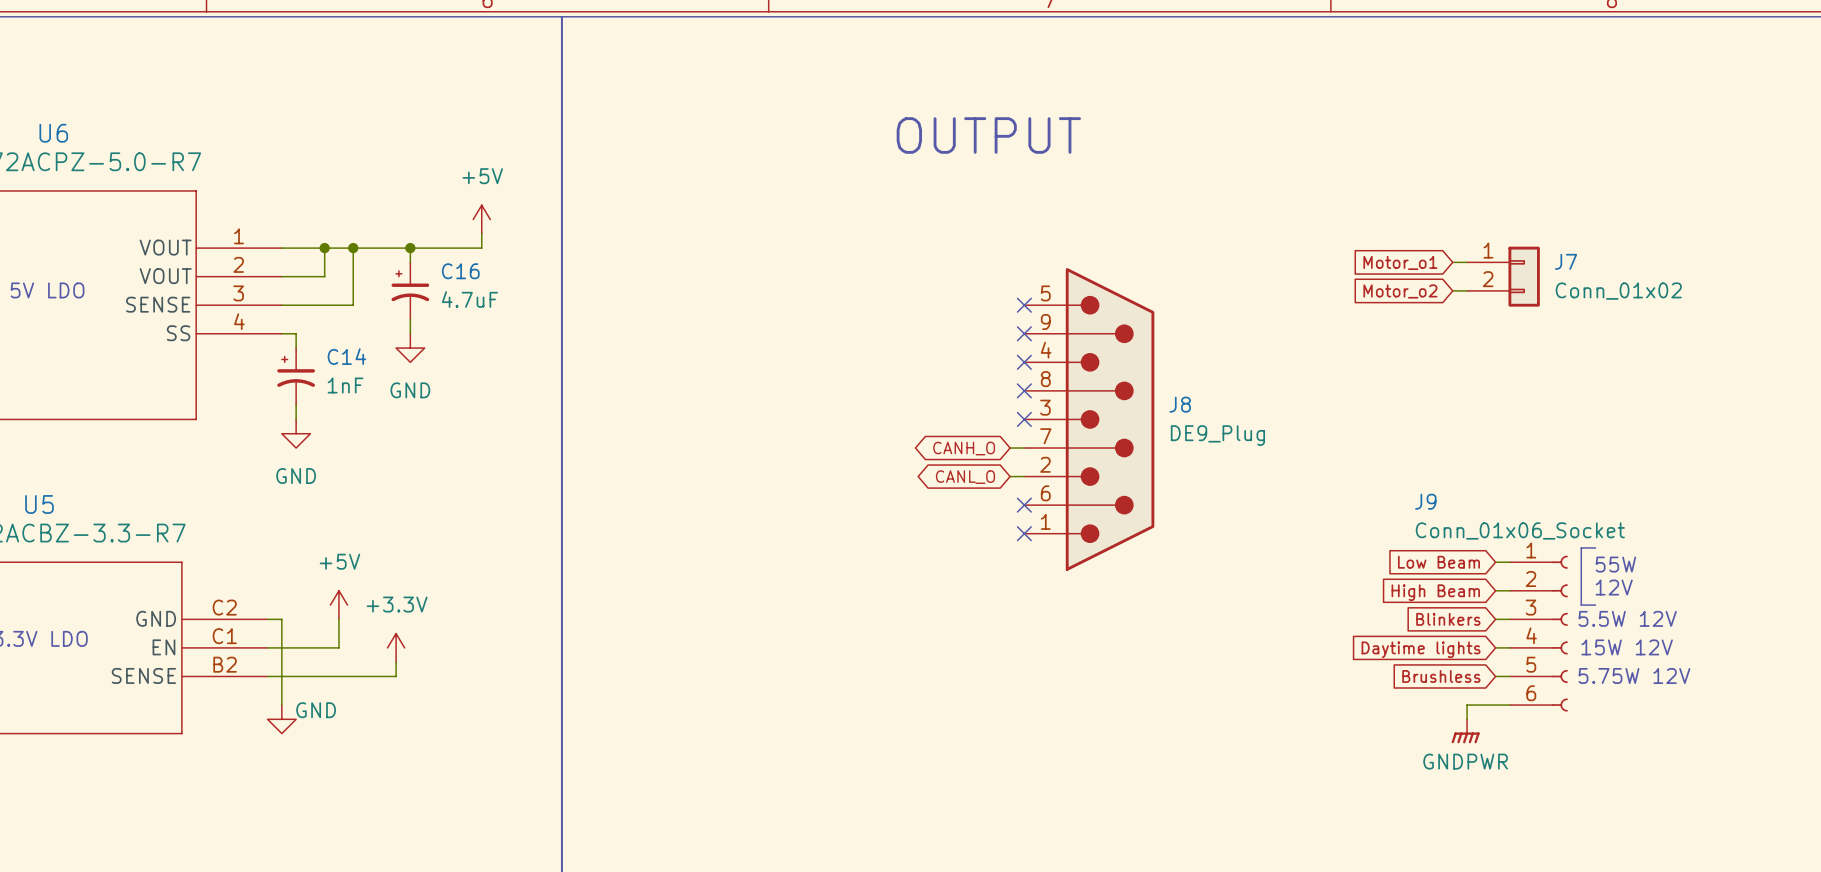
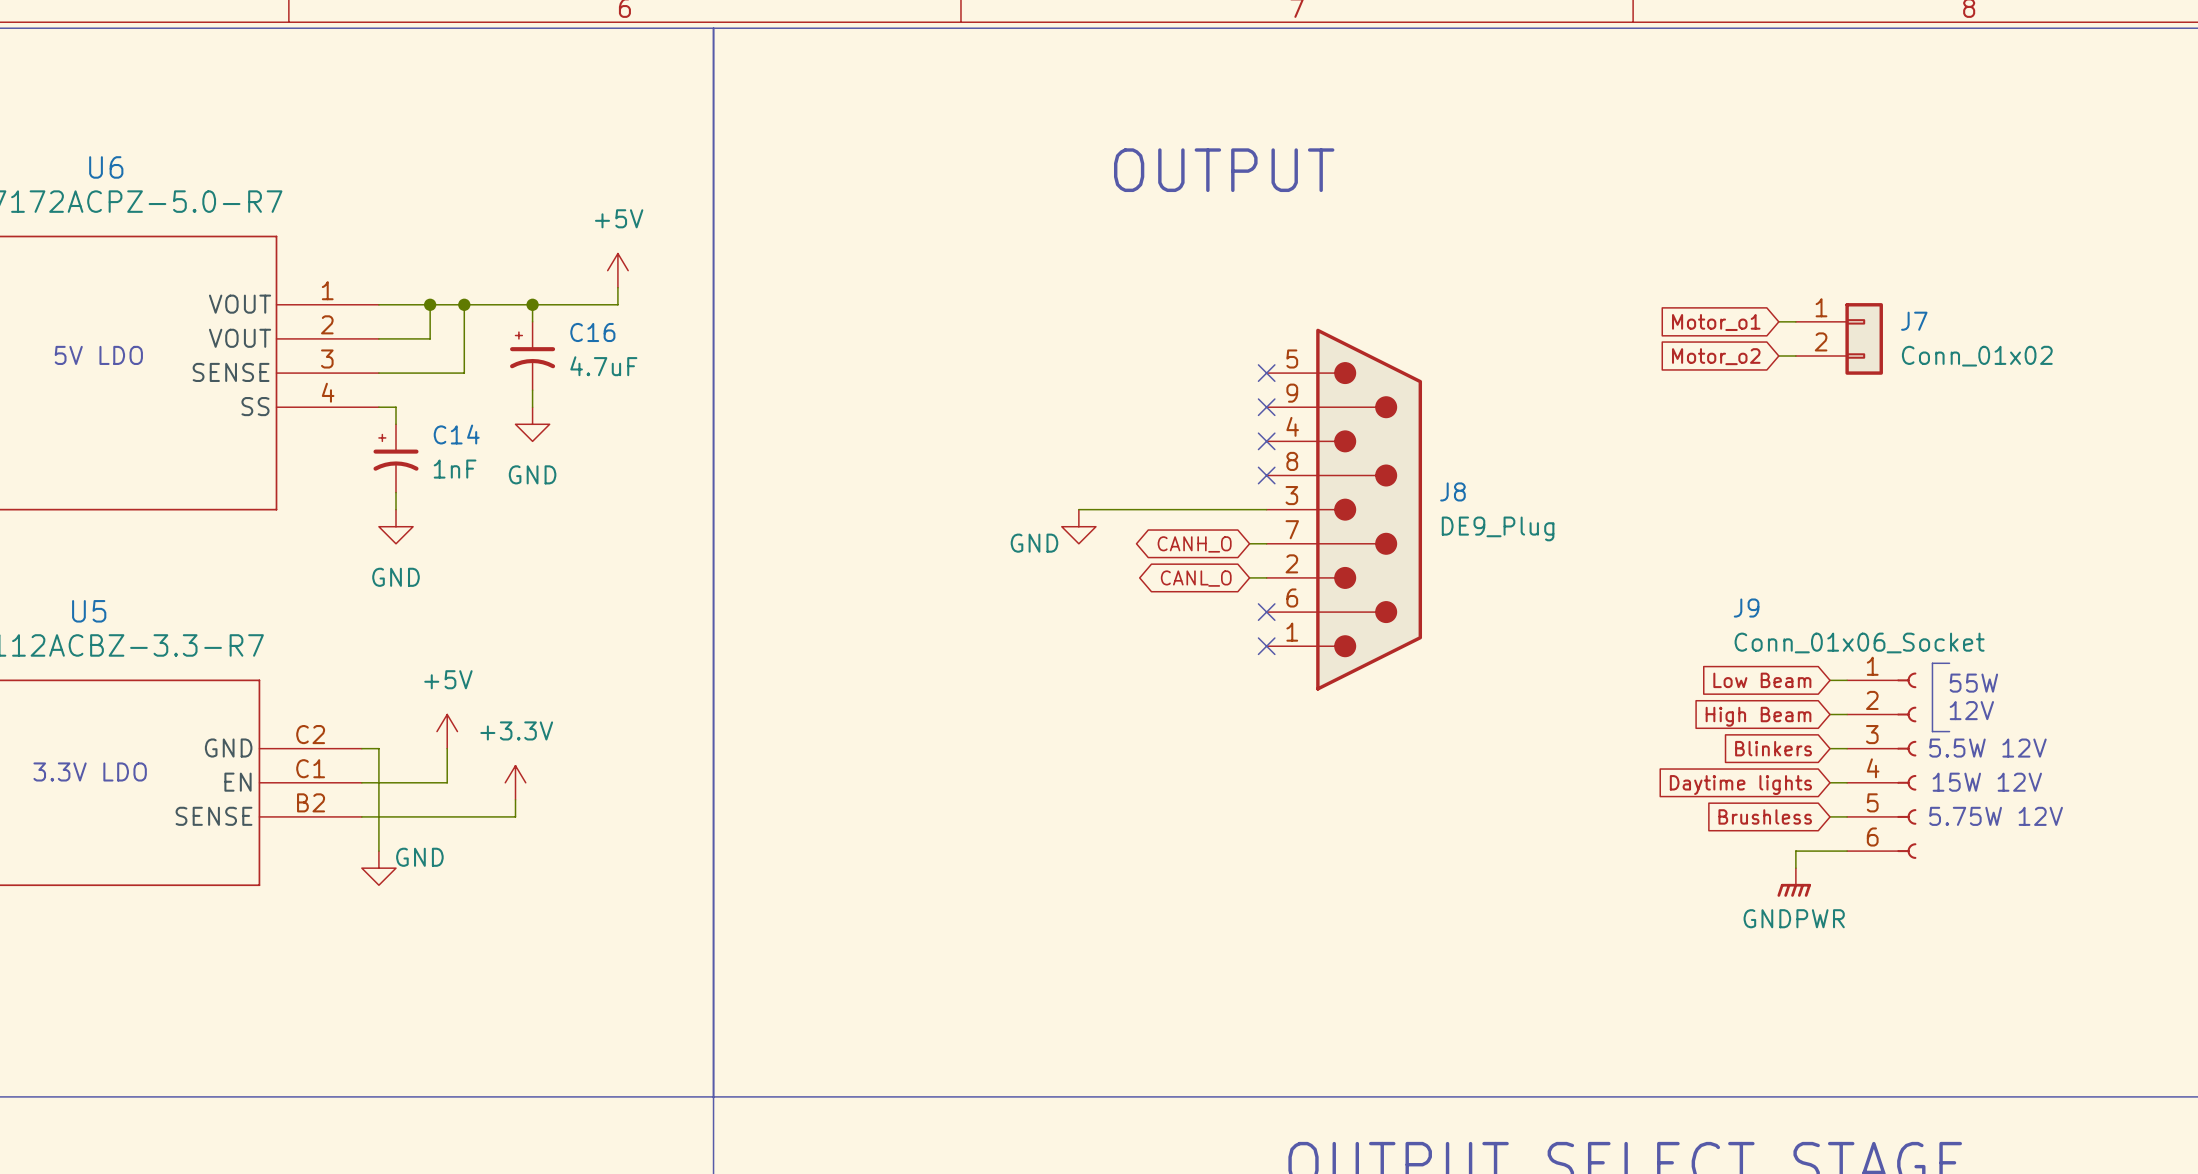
wire: none -> (1078, 509) (1266, 509)
no-connect mark: (1024, 419) -> none
power symbol: none -> GND (1078, 526)

